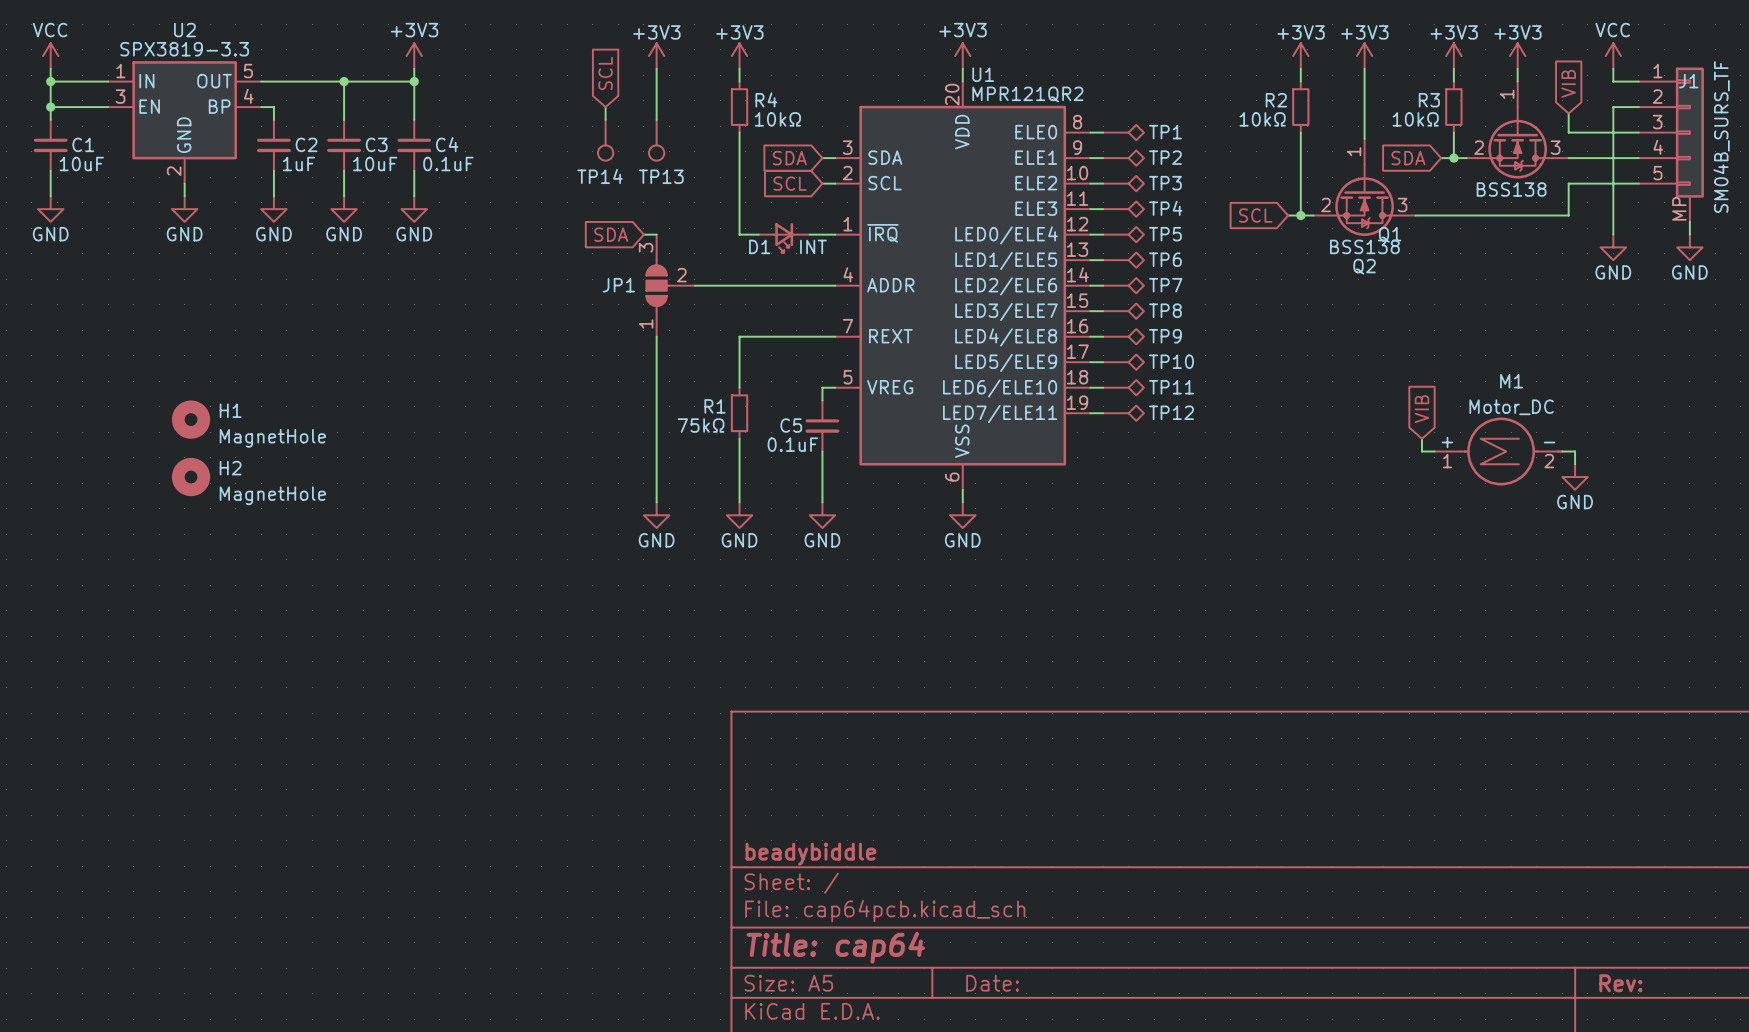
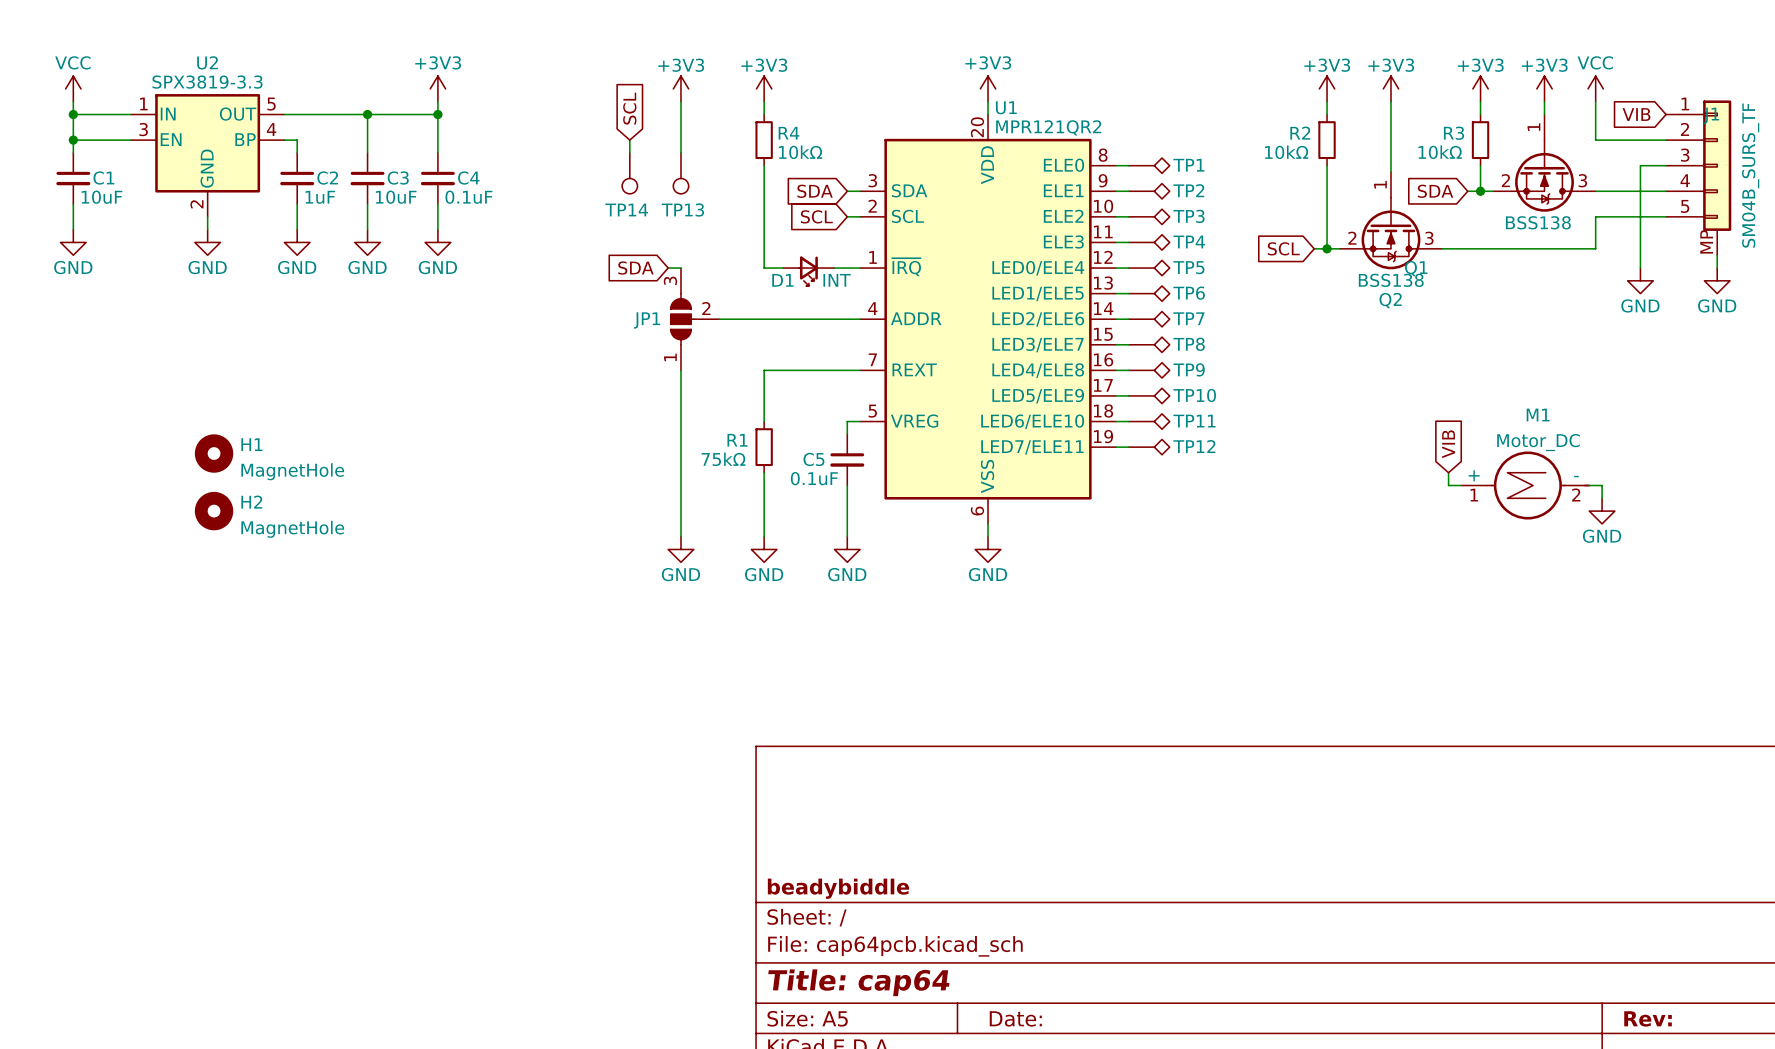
power symbol position: VCC (1613, 56) -> VCC (1595, 88)
wire: (1613, 68) (1613, 81) (1638, 81) -> none
global label rotation: 0° (1568, 83) -> 90° counterclockwise (1636, 114)
wire: (1613, 107) (1613, 132) (1568, 132) (1568, 113) -> (1640, 140) (1595, 140) (1595, 101)

